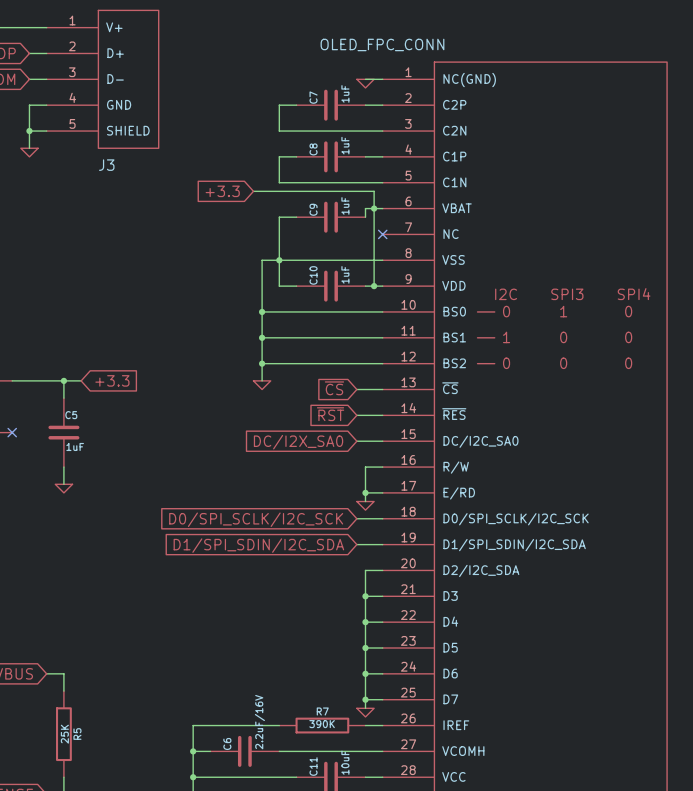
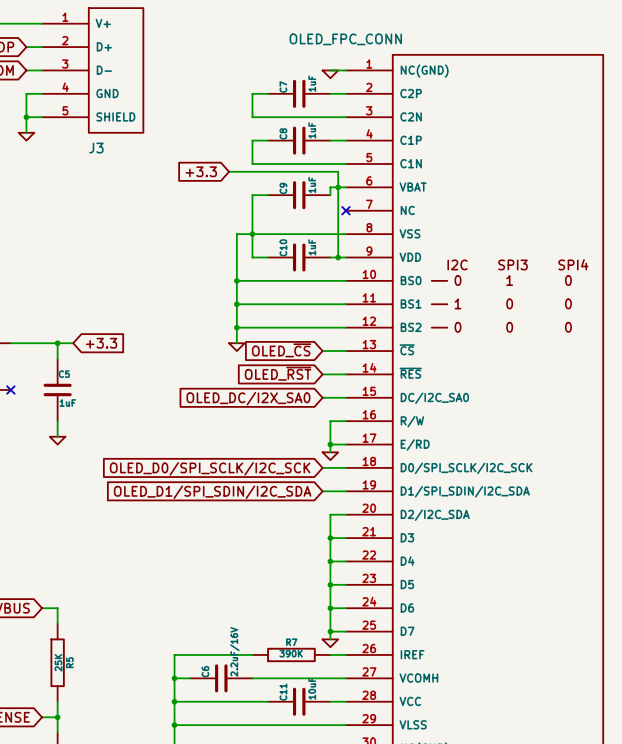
global label: ~{CS} (334, 388) -> OLED_~{CS} (281, 350)
global label: ~{RST} (330, 414) -> OLED_~{RST} (278, 373)
global label: DC/I2X_SA0 (298, 442) -> OLED_DC/I2X_SA0 (248, 398)
global label: D0/SPI_SCLK/I2C_SCK (256, 519) -> OLED_D0/SPI_SCLK/I2C_SCK (210, 468)
global label: D1/SPI_SDIN/I2C_SDA (258, 545) -> OLED_D1/SPI_SDIN/I2C_SDA (212, 492)

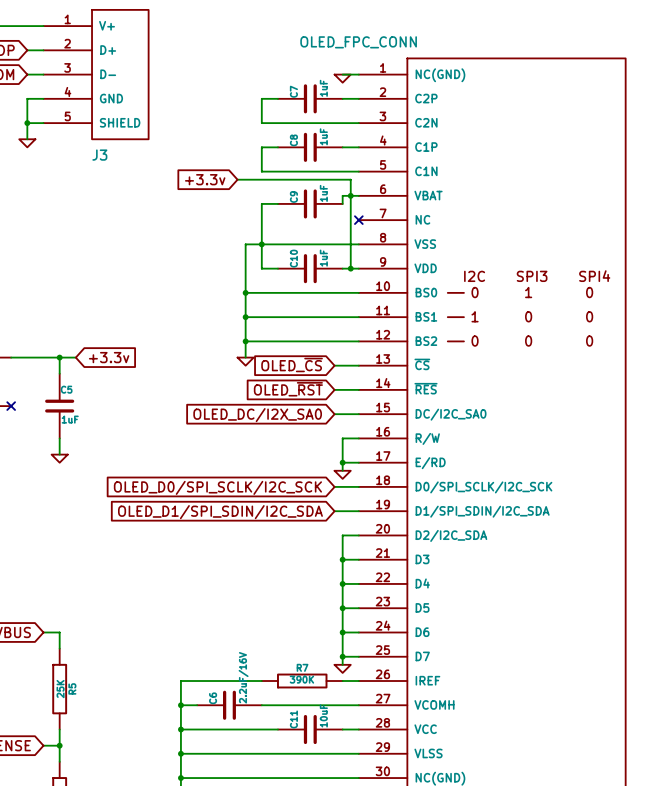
global label: +3.3 (201, 171) -> +3.3v (205, 179)
global label: +3.3 (101, 343) -> +3.3v (109, 357)

